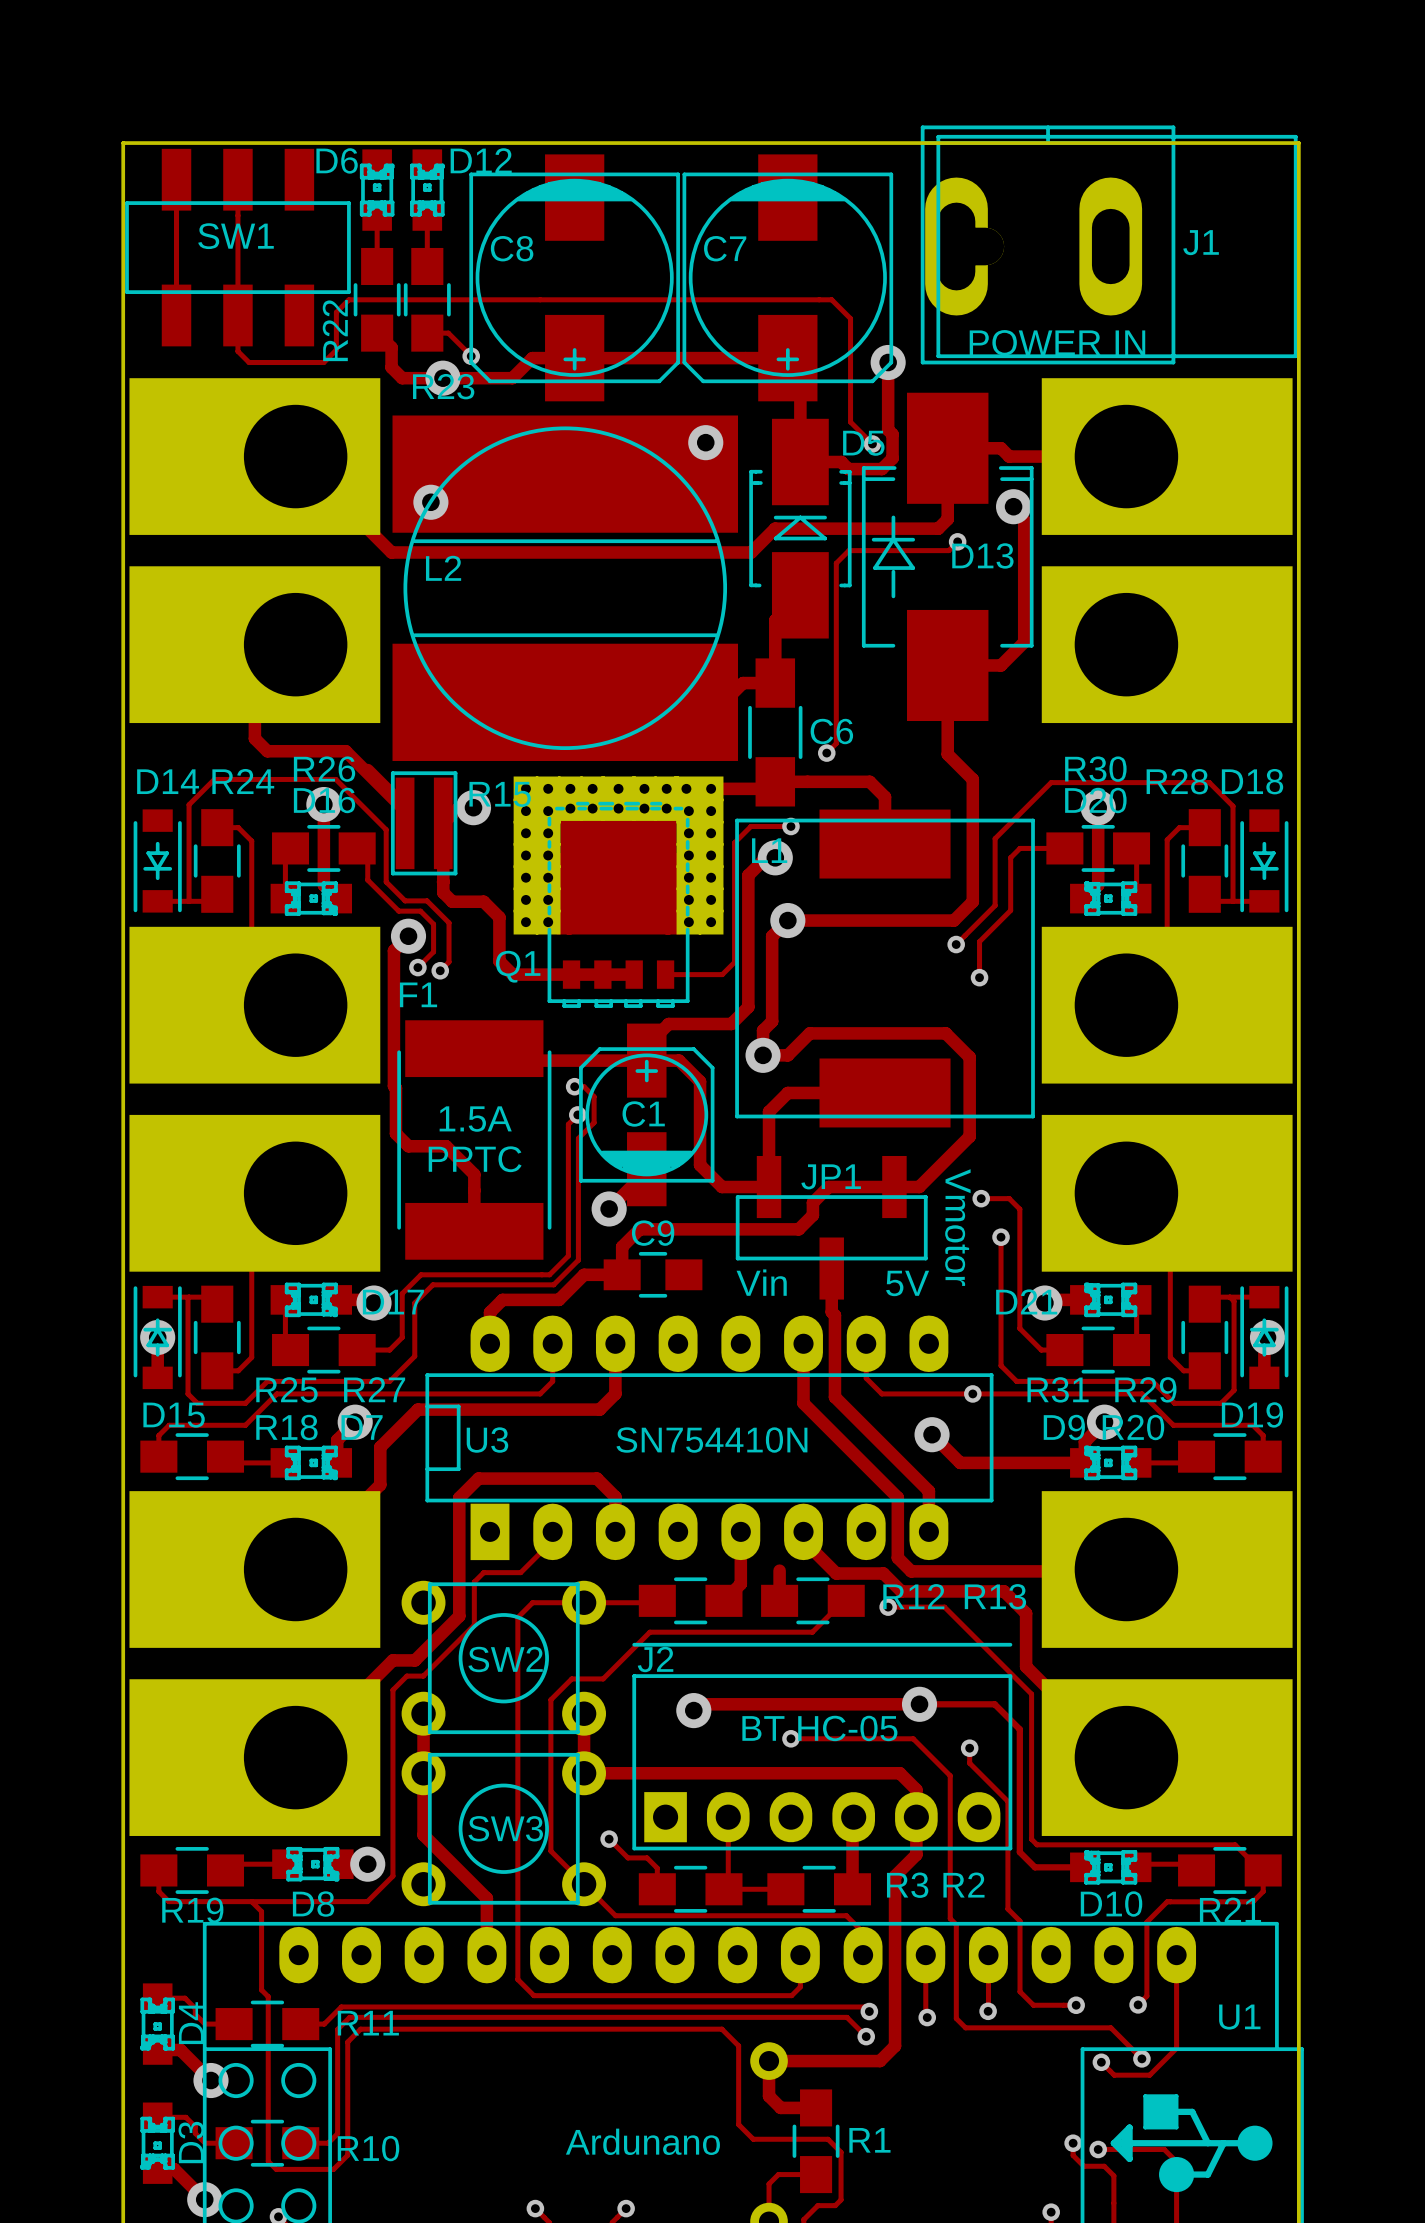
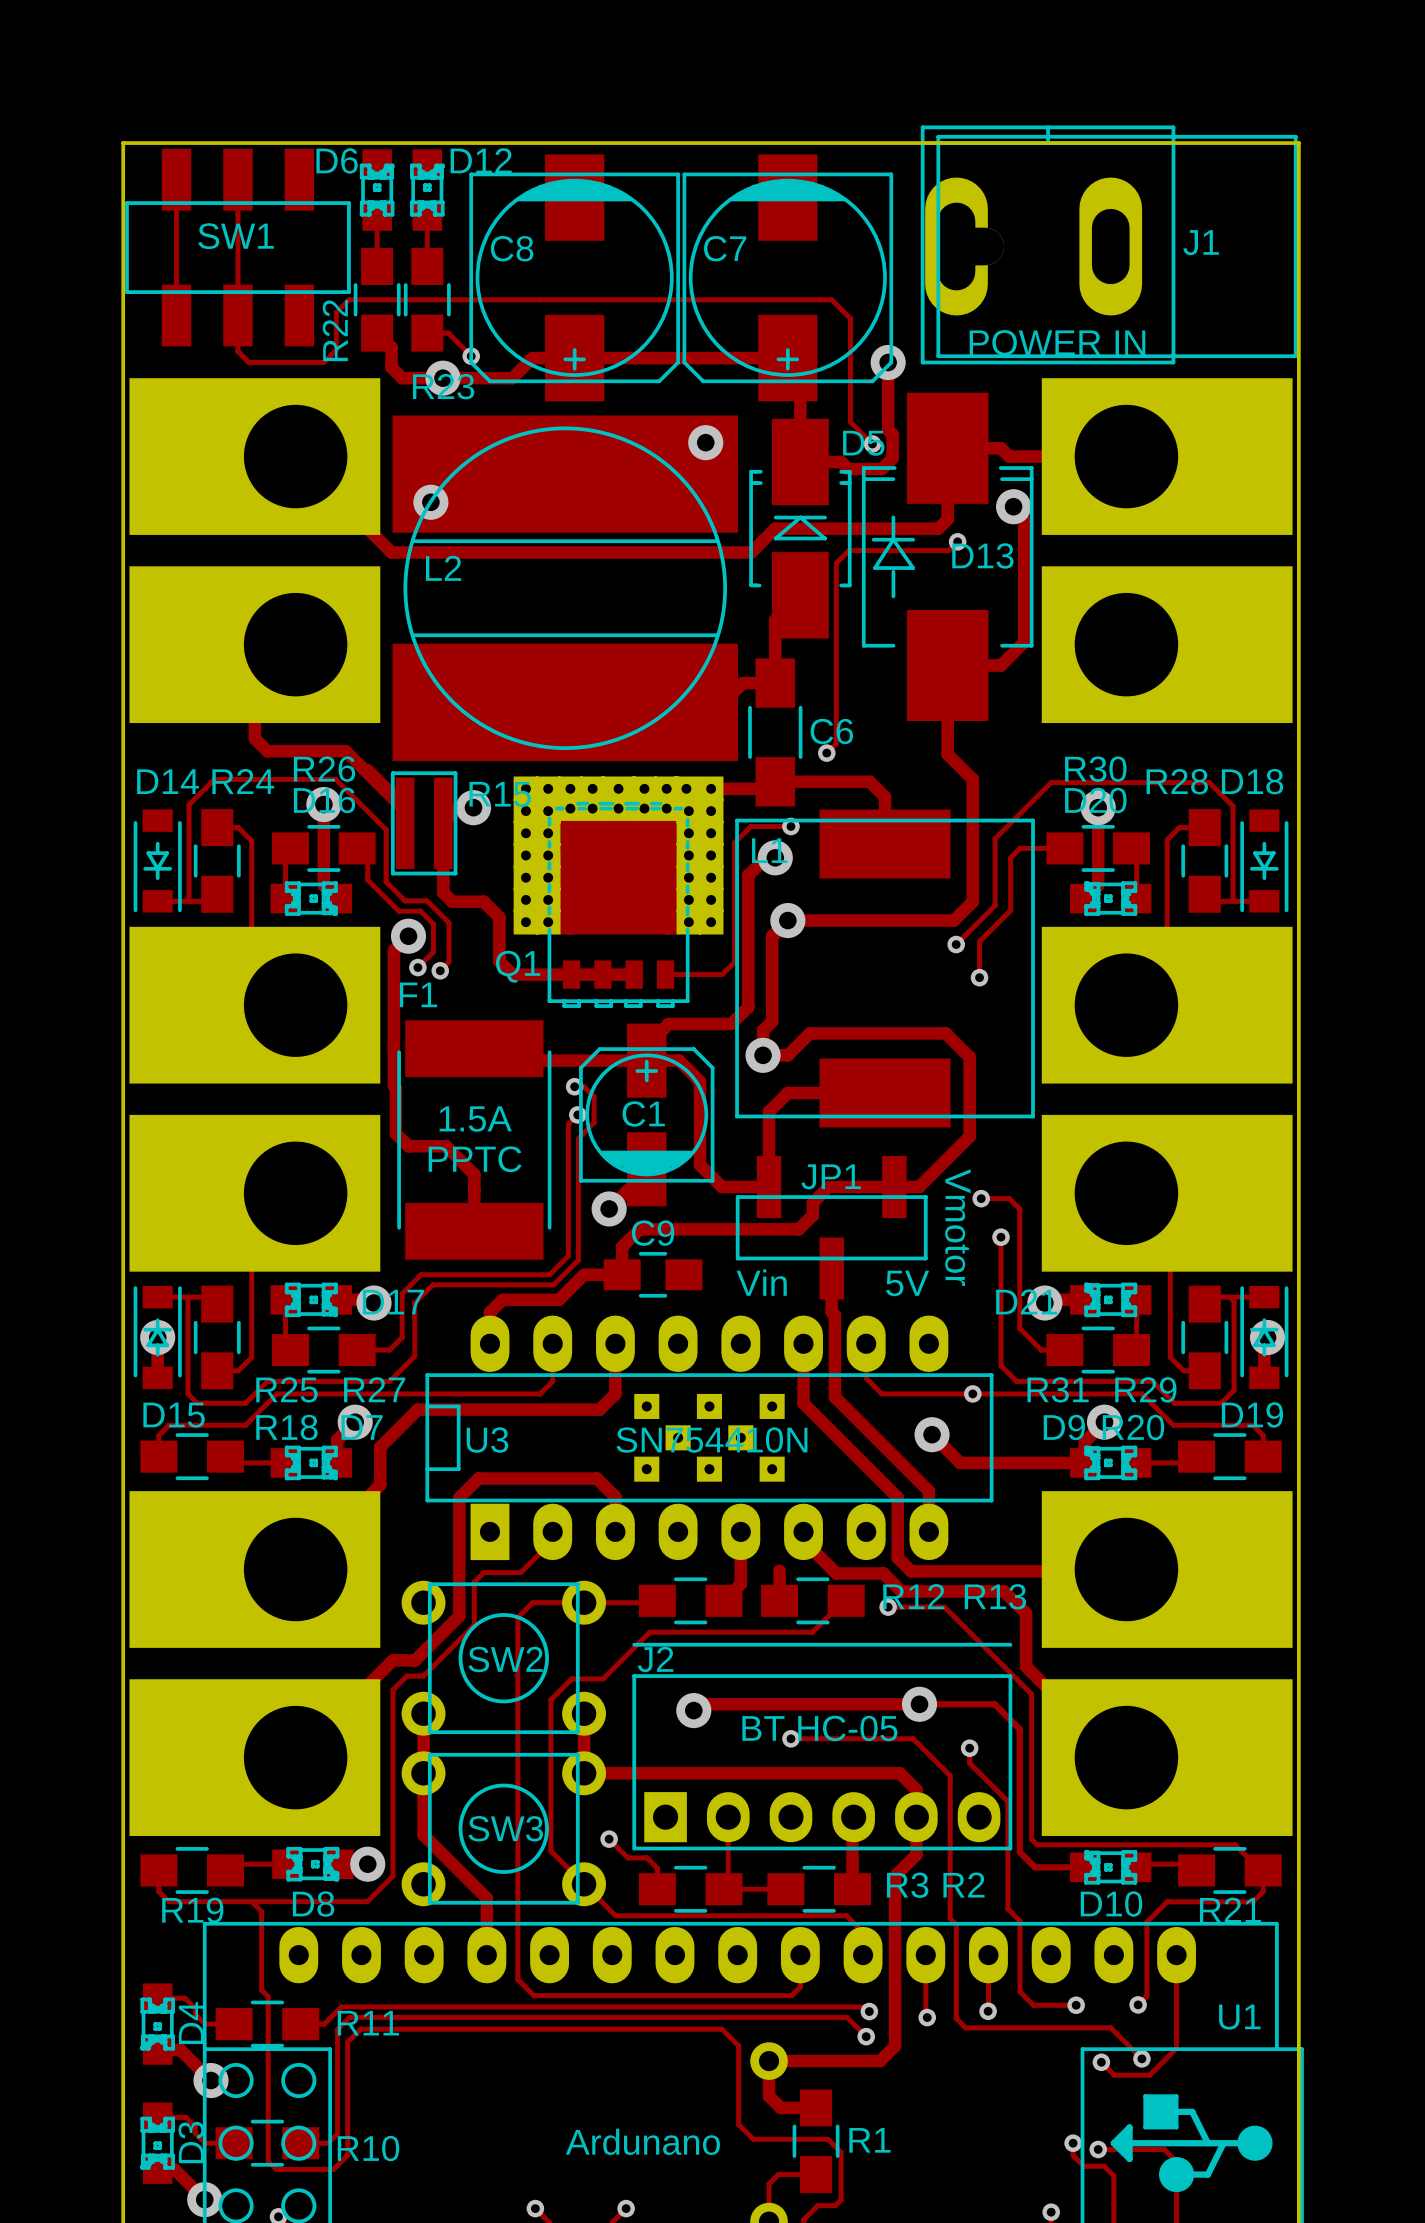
U3 footprint: [425, 1315, 994, 1561] -> [425, 1315, 994, 1561]

